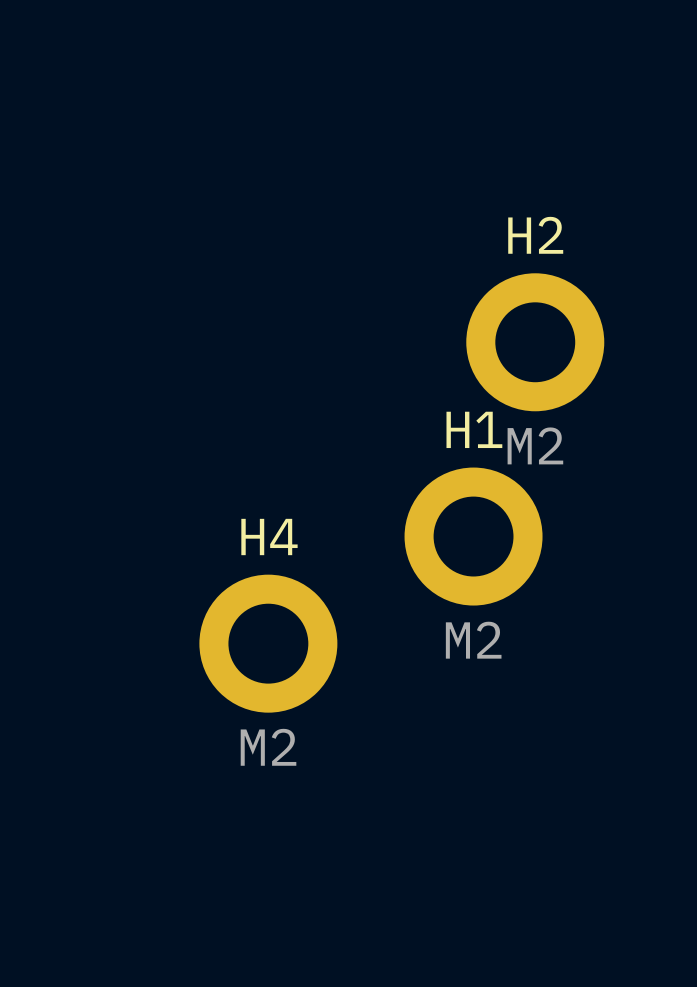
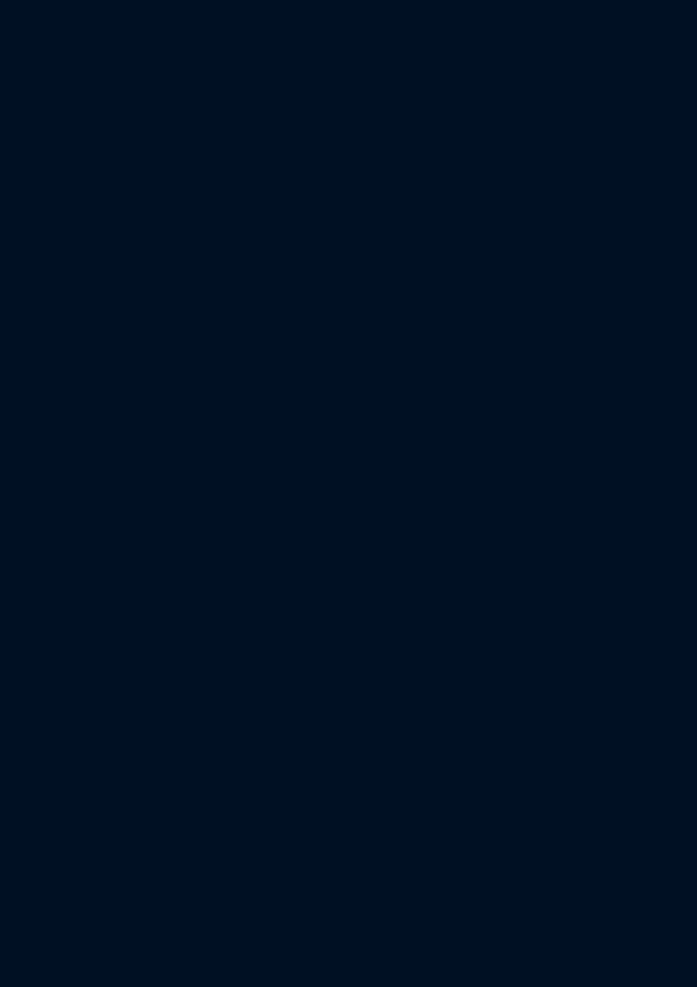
H2: M2 (535, 342) -> none
H1: M2 (473, 536) -> none
H4: M2 (268, 643) -> none

